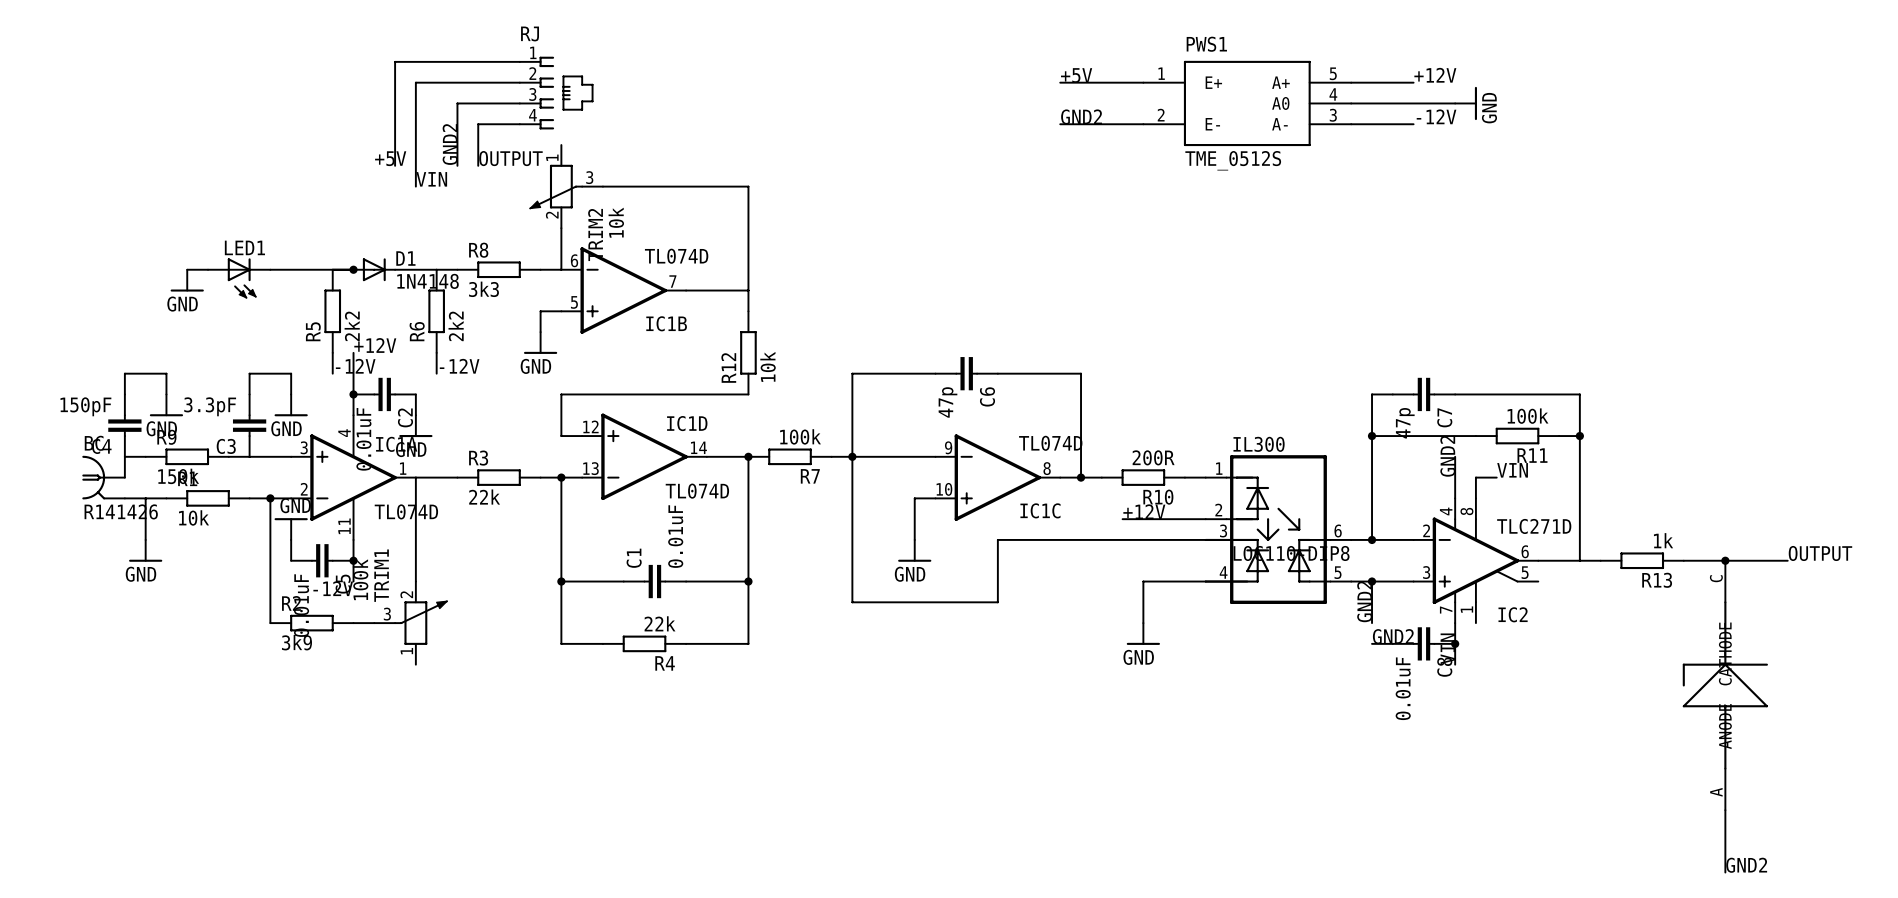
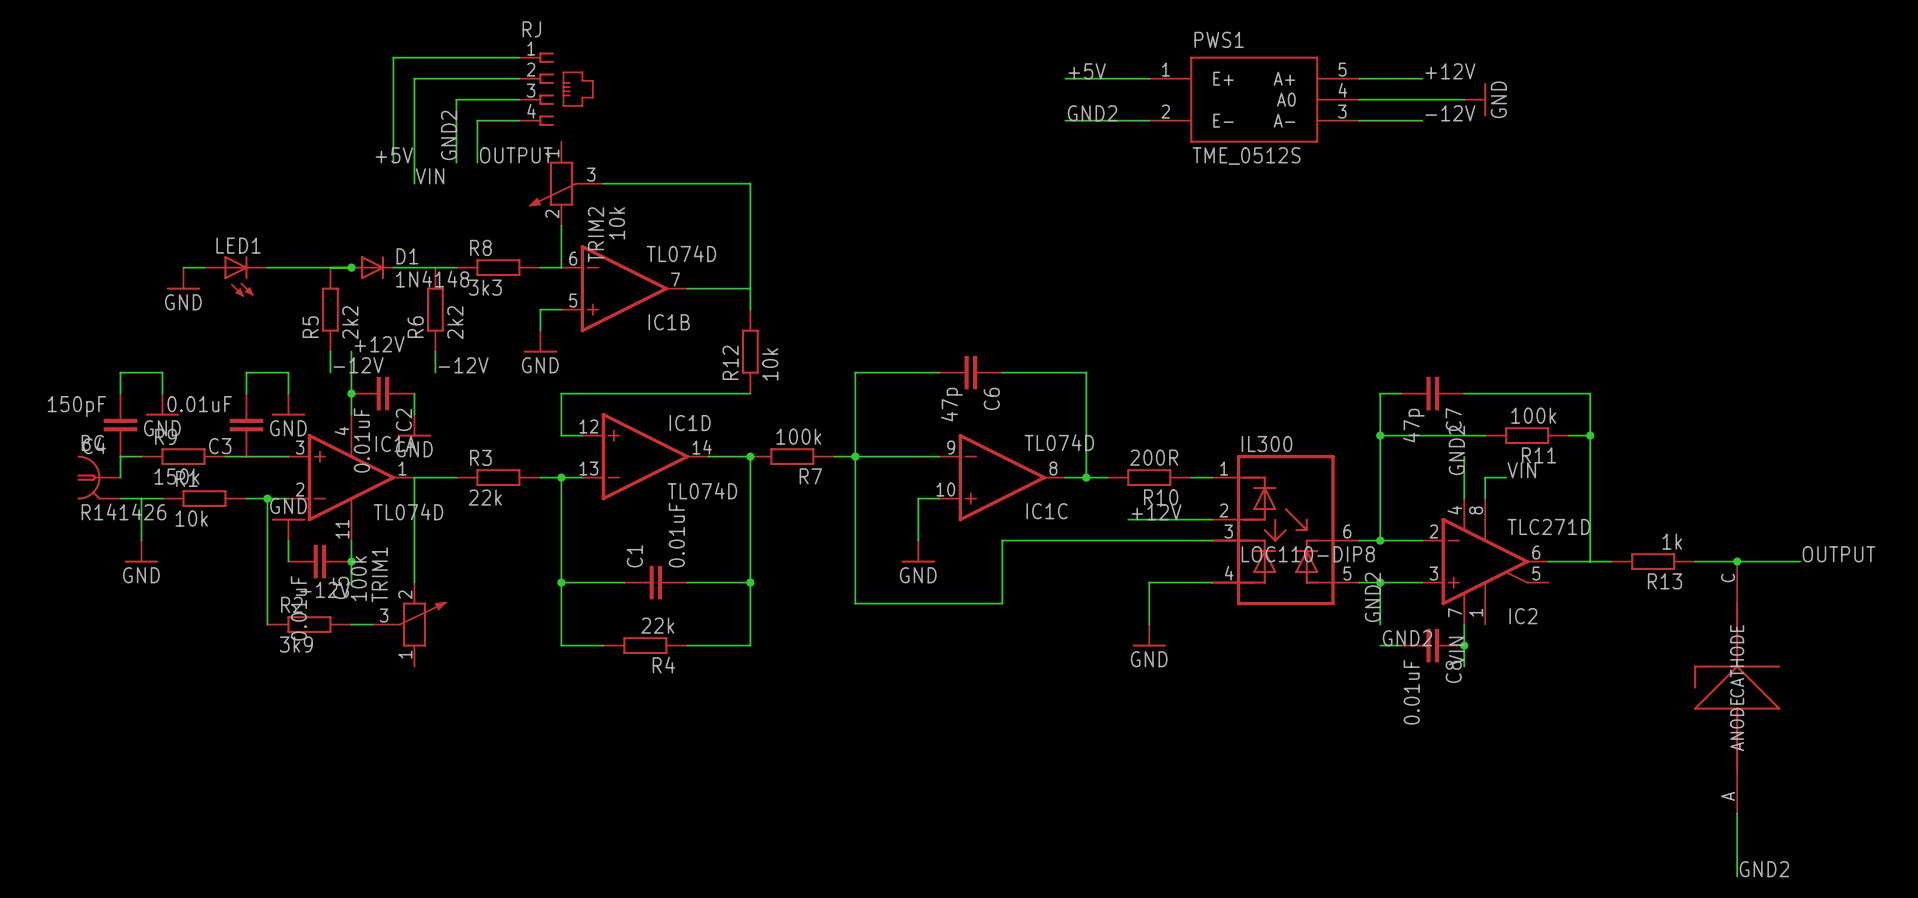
C3 value: 3.3pF (210, 406) -> 0.01uF (199, 404)

